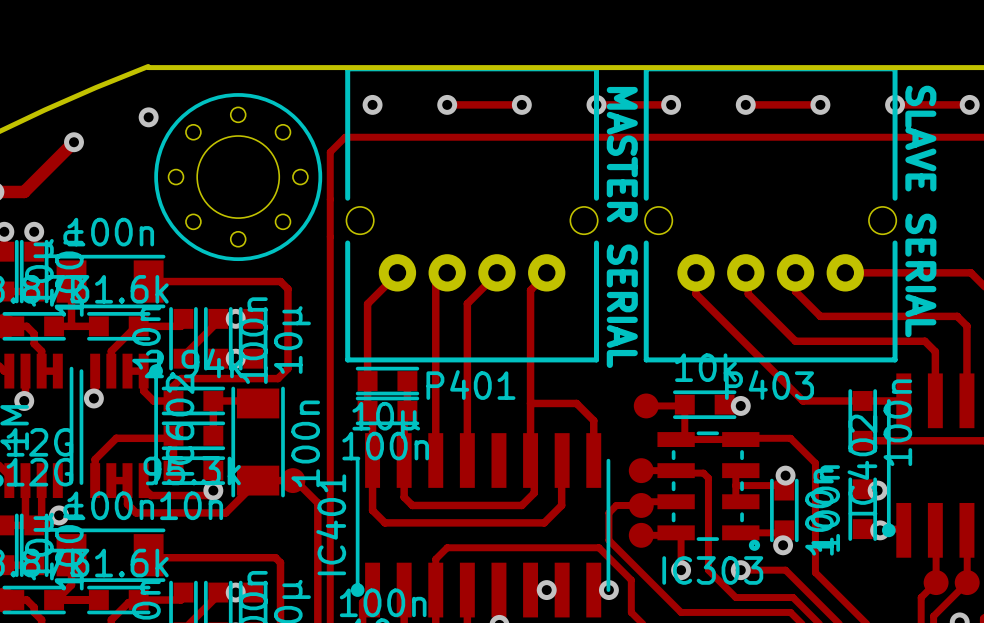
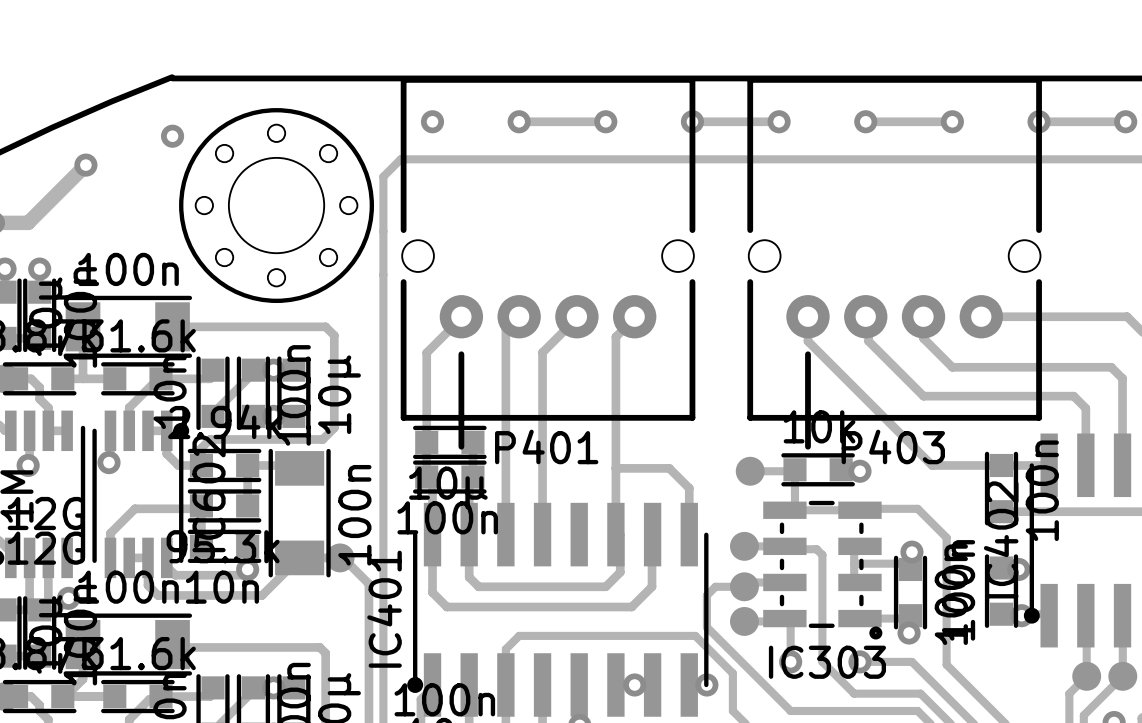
P401 footprint: [345, 66, 599, 363] -> [400, 77, 696, 450]
P403 footprint: [643, 66, 898, 363] -> [747, 77, 1042, 450]
text: SLAVE SERIAL (920, 211) -> none
text: MASTER SERIAL (622, 227) -> none

